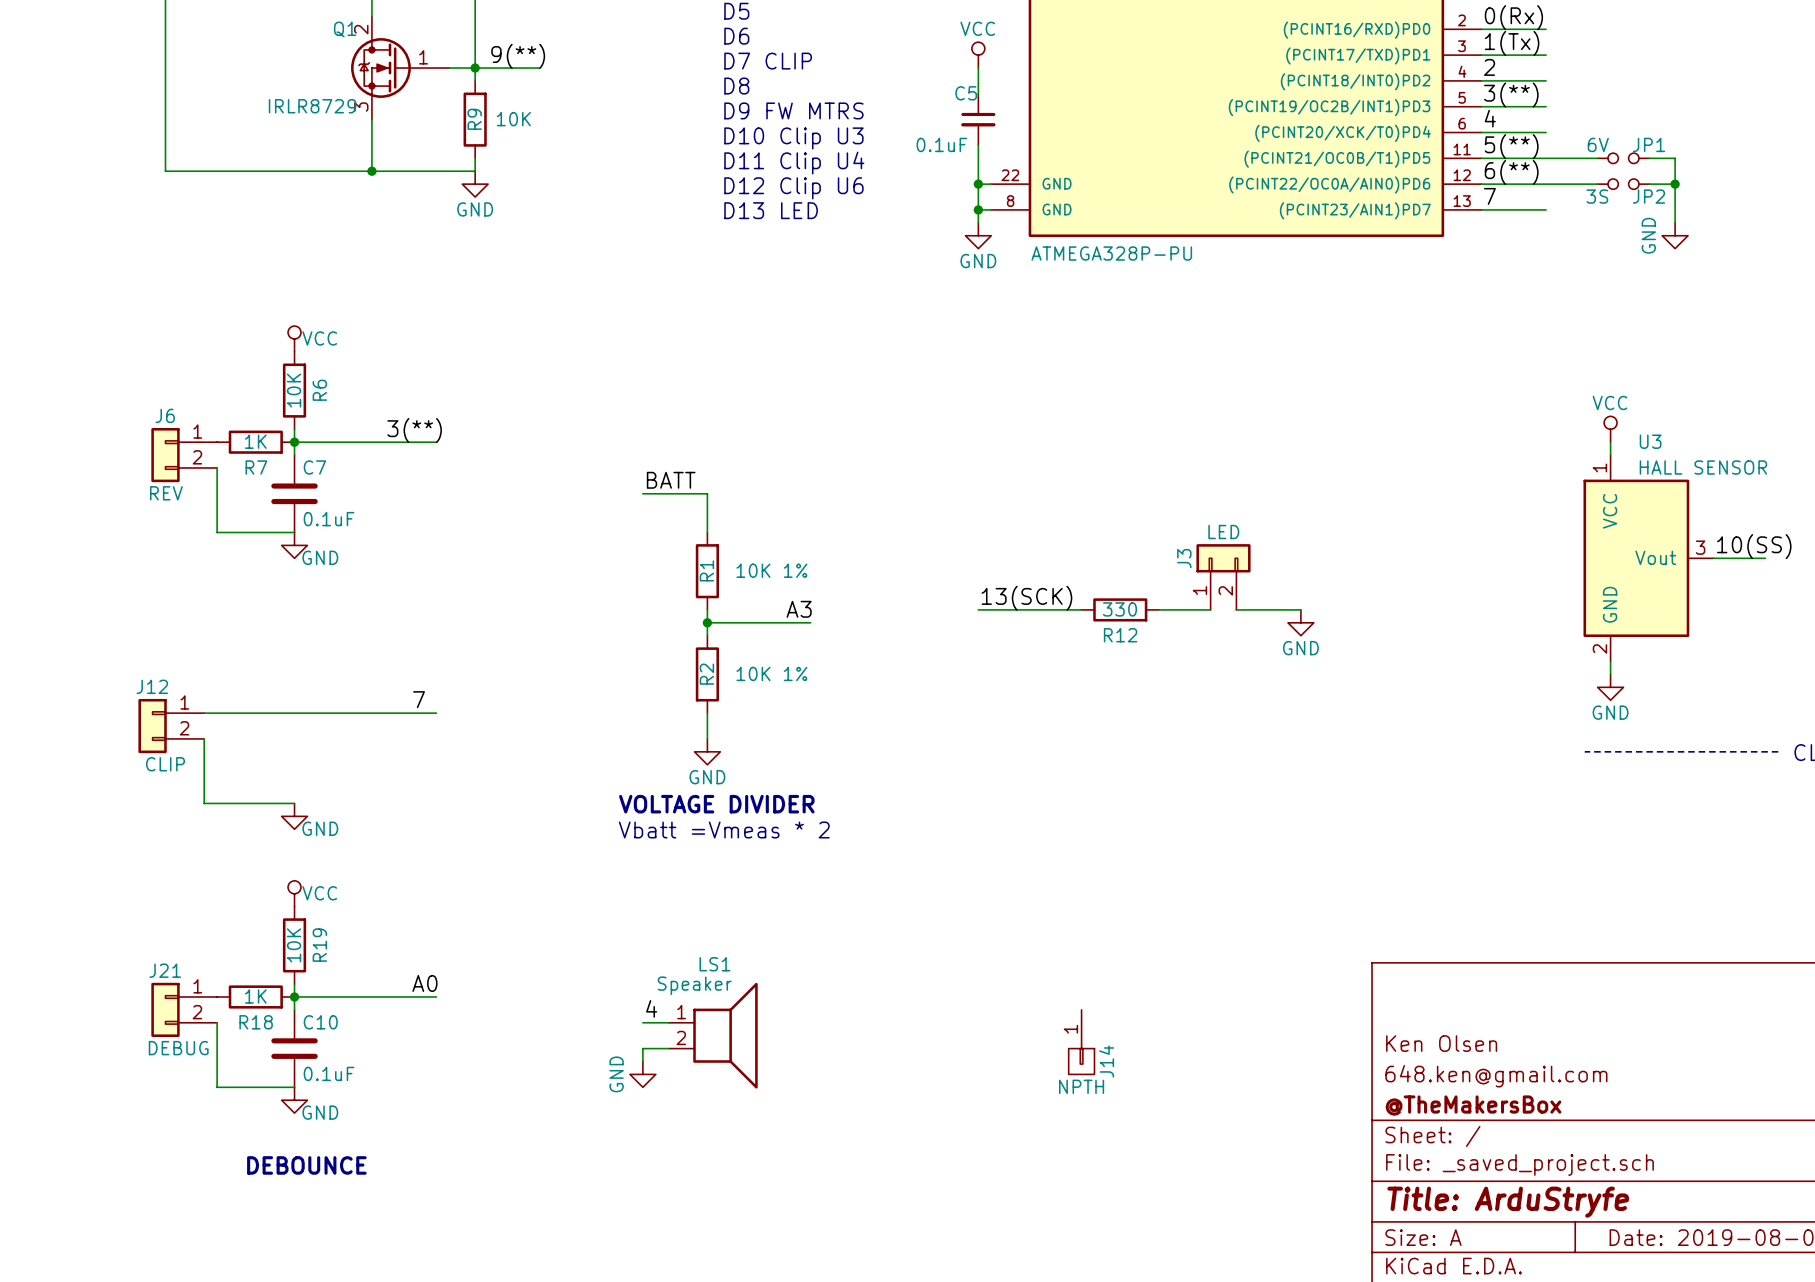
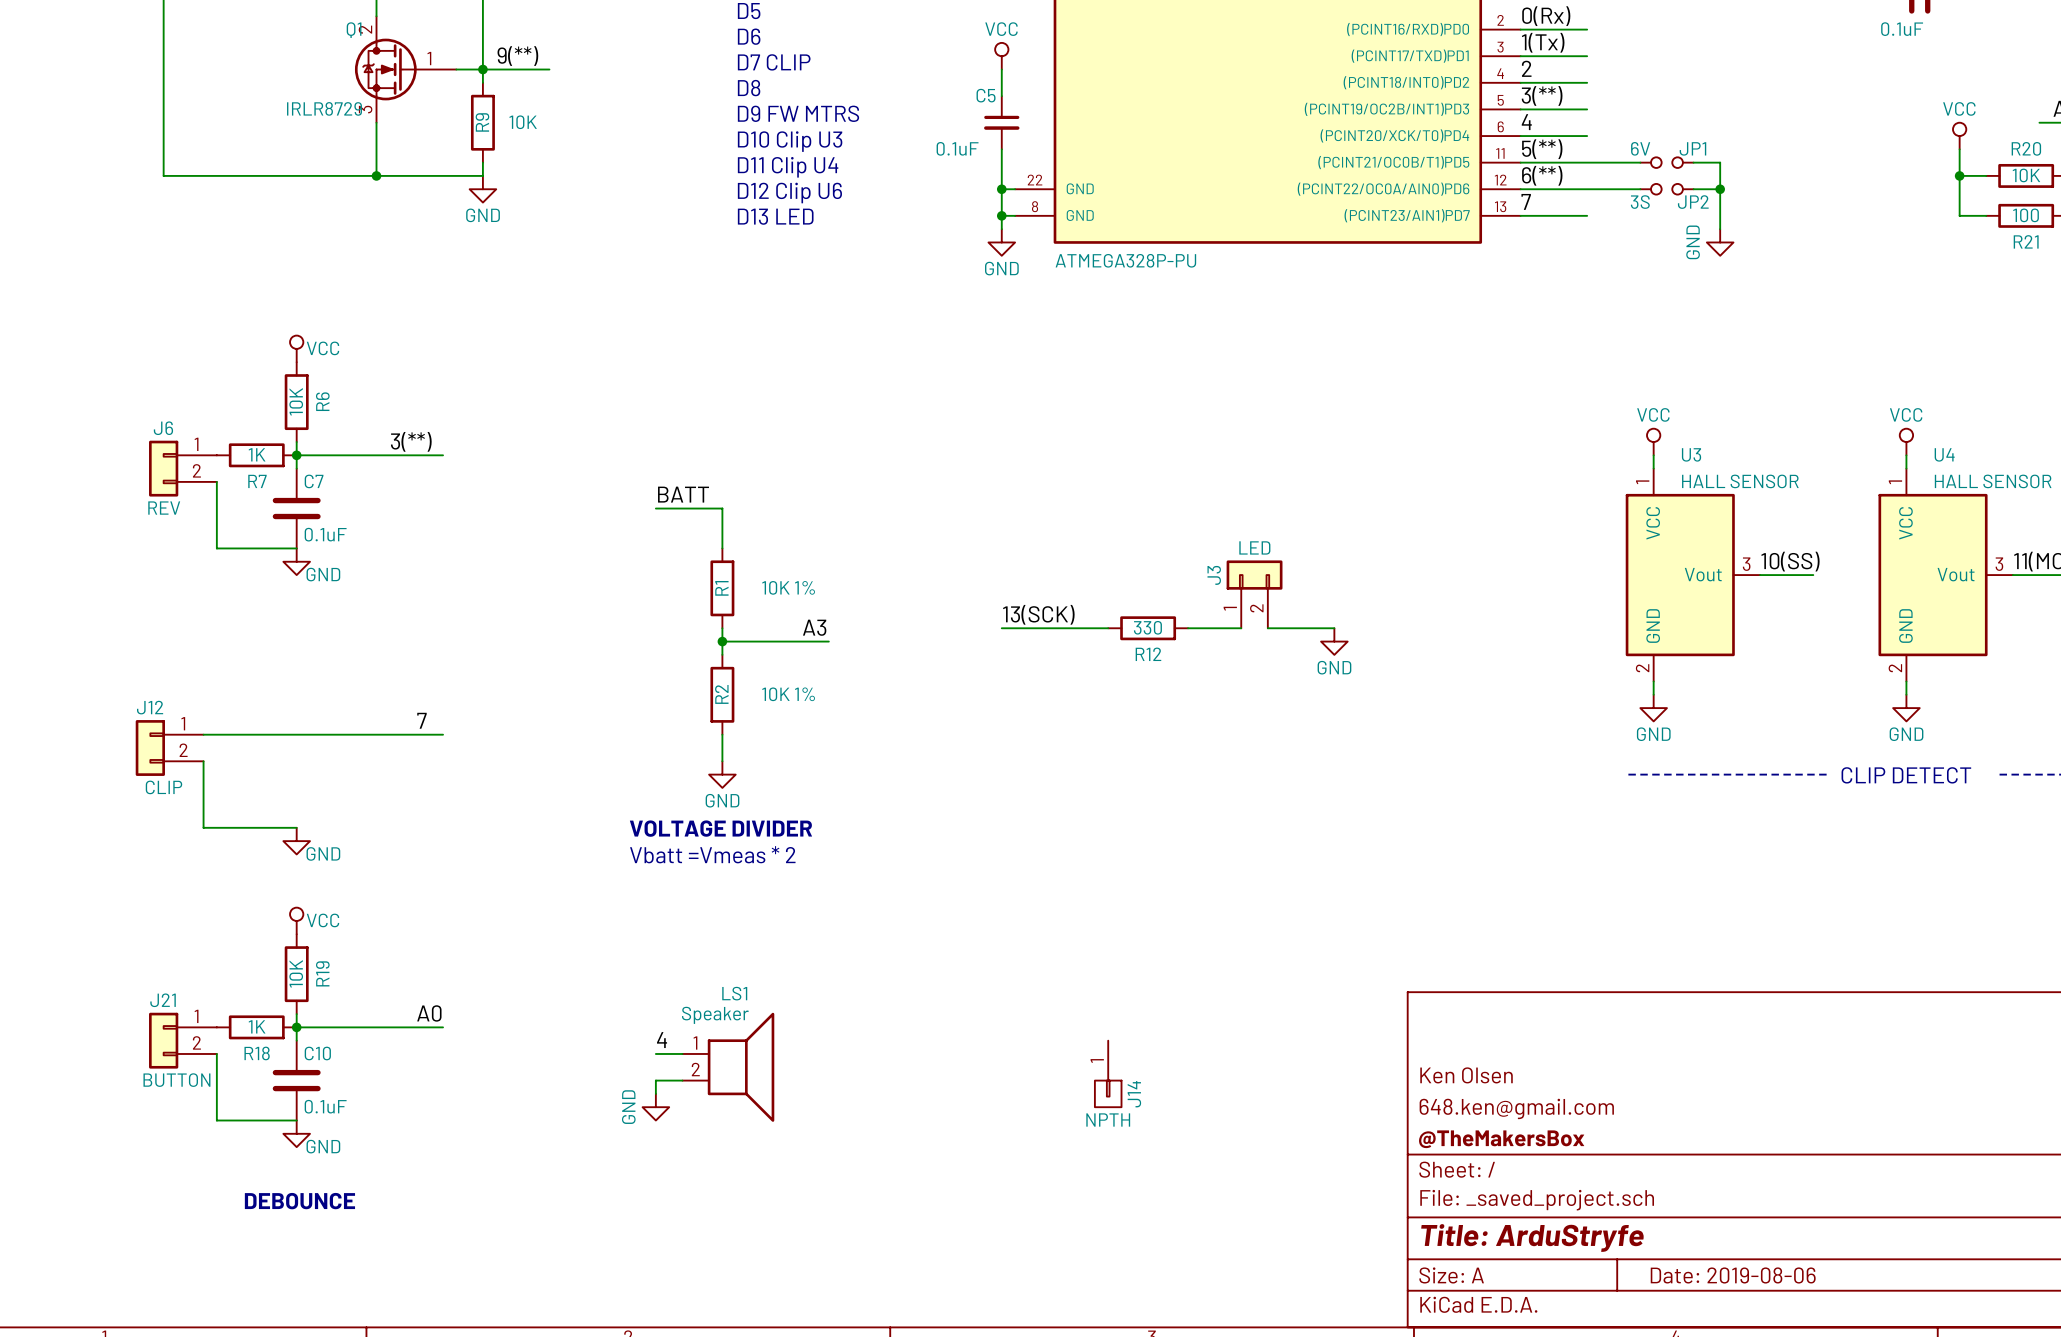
J21 value: DEBUG (178, 1048) -> BUTTON (176, 1080)

